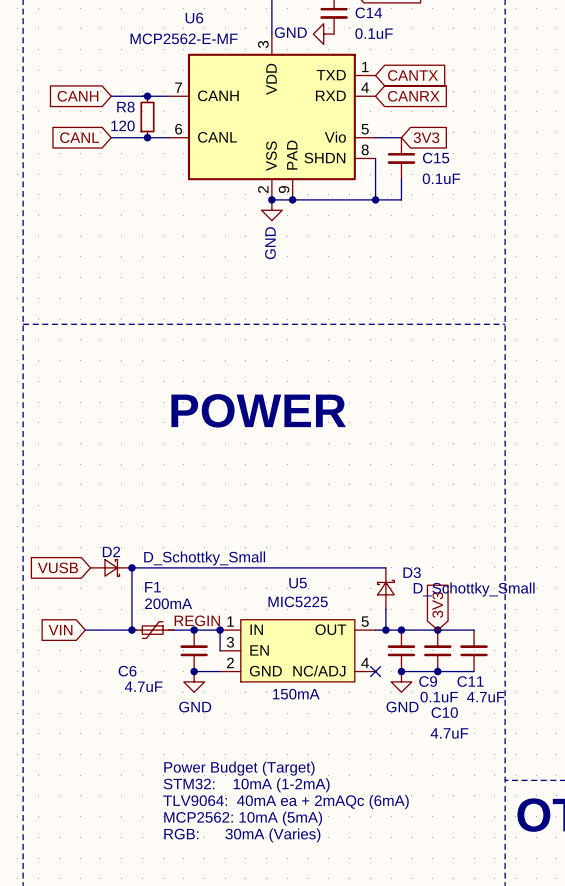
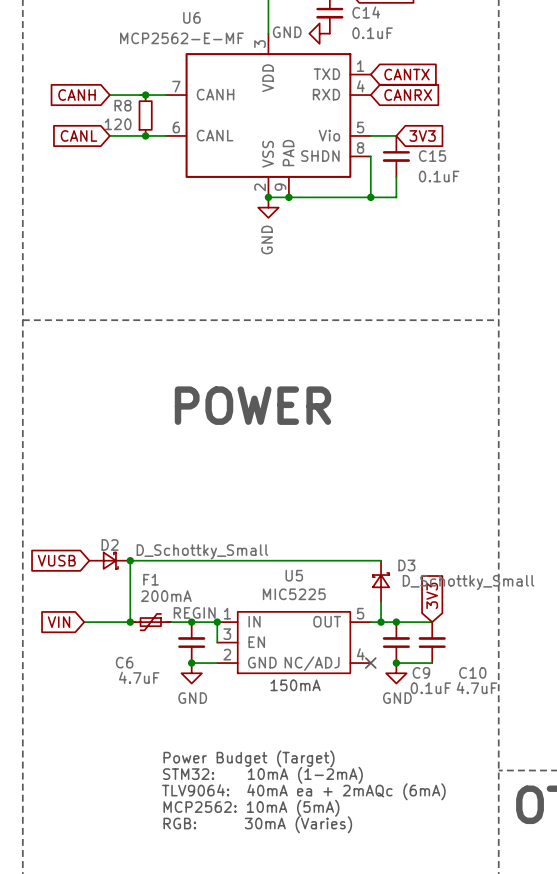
wire: (437, 630) (474, 630) -> none
junction: (437, 630) -> none
C11: 4.7uF (474, 650) -> none
wire: (437, 671) (474, 671) -> none
junction: (437, 671) -> none
C10 name position: C10 (444, 712) -> C10 (472, 672)
C10 value position: 4.7uF (449, 733) -> 4.7uF (476, 688)

